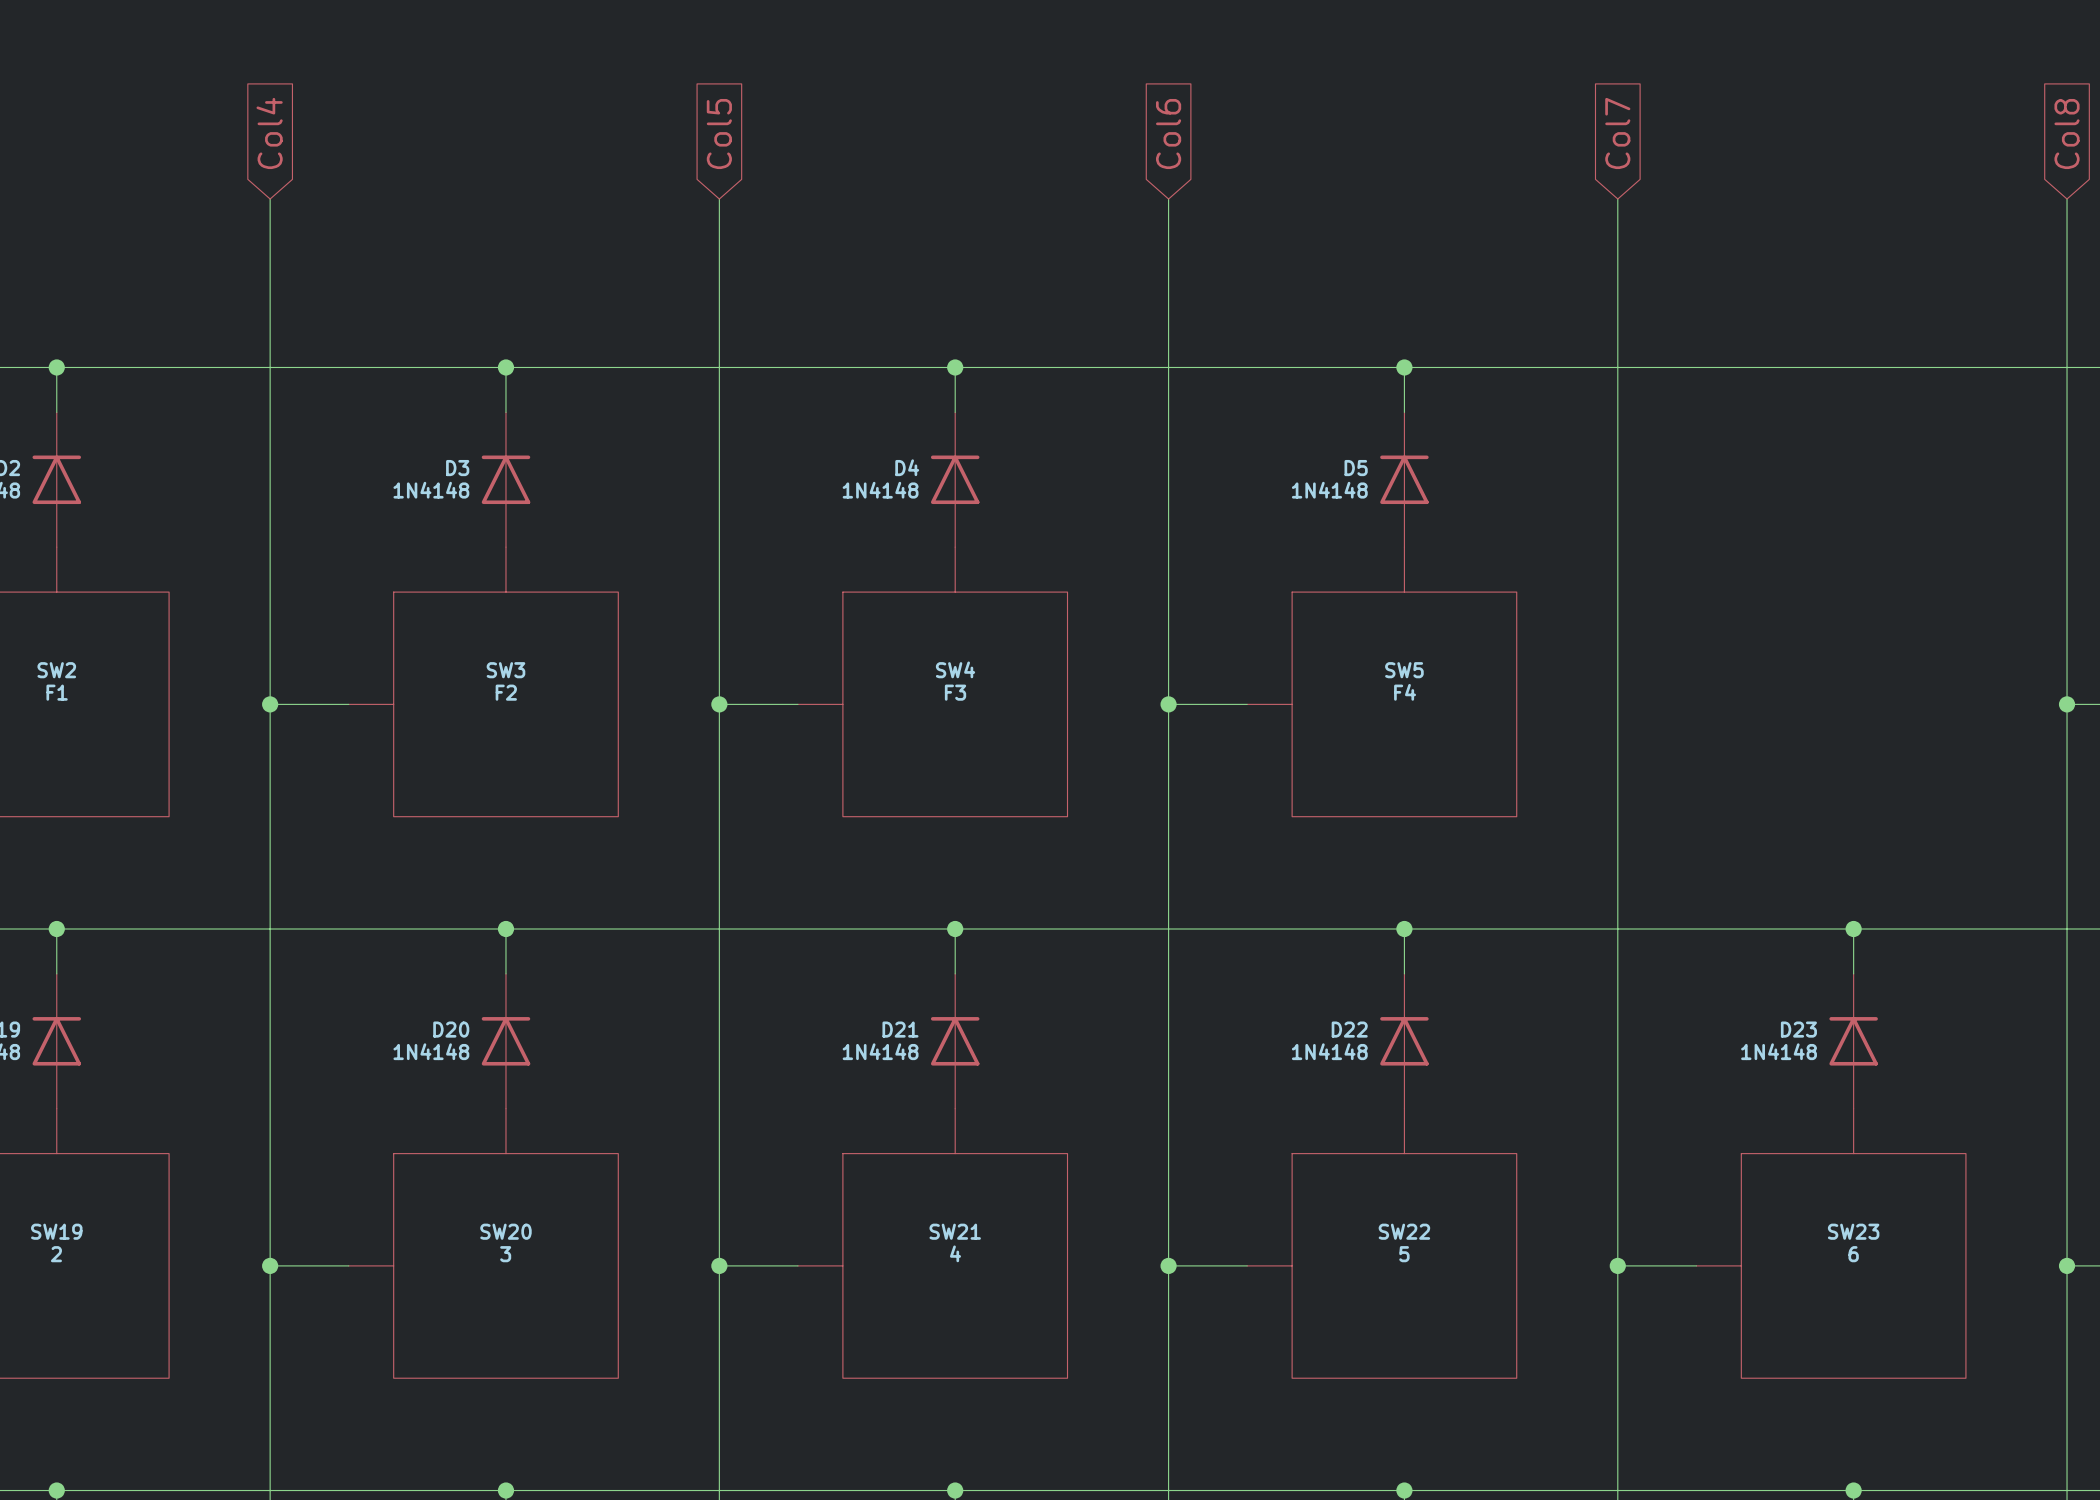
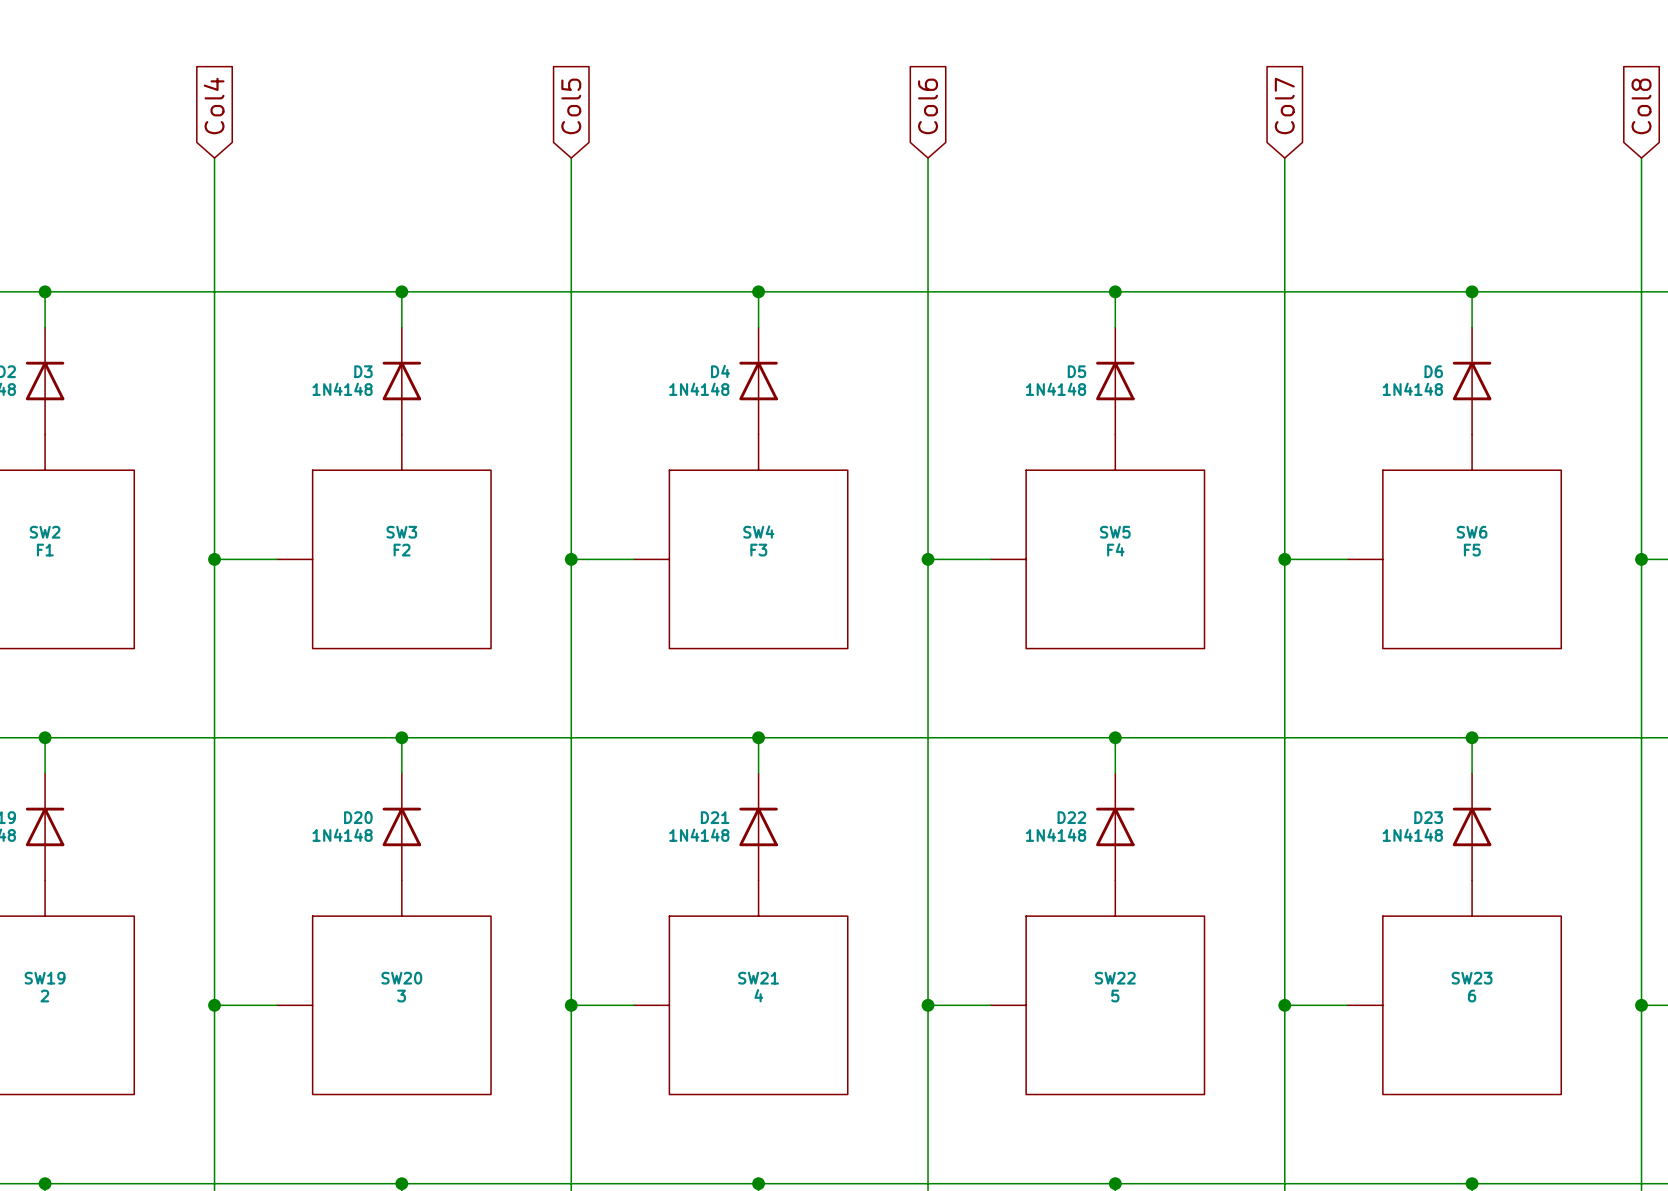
wire: none -> (1472, 291) (1472, 327)
junction: none -> (1472, 291)
D6: none -> 1N4148 (1472, 381)
SW6: none -> F5 (1454, 541)
wire: none -> (1284, 559) (1347, 559)
junction: none -> (1284, 559)

